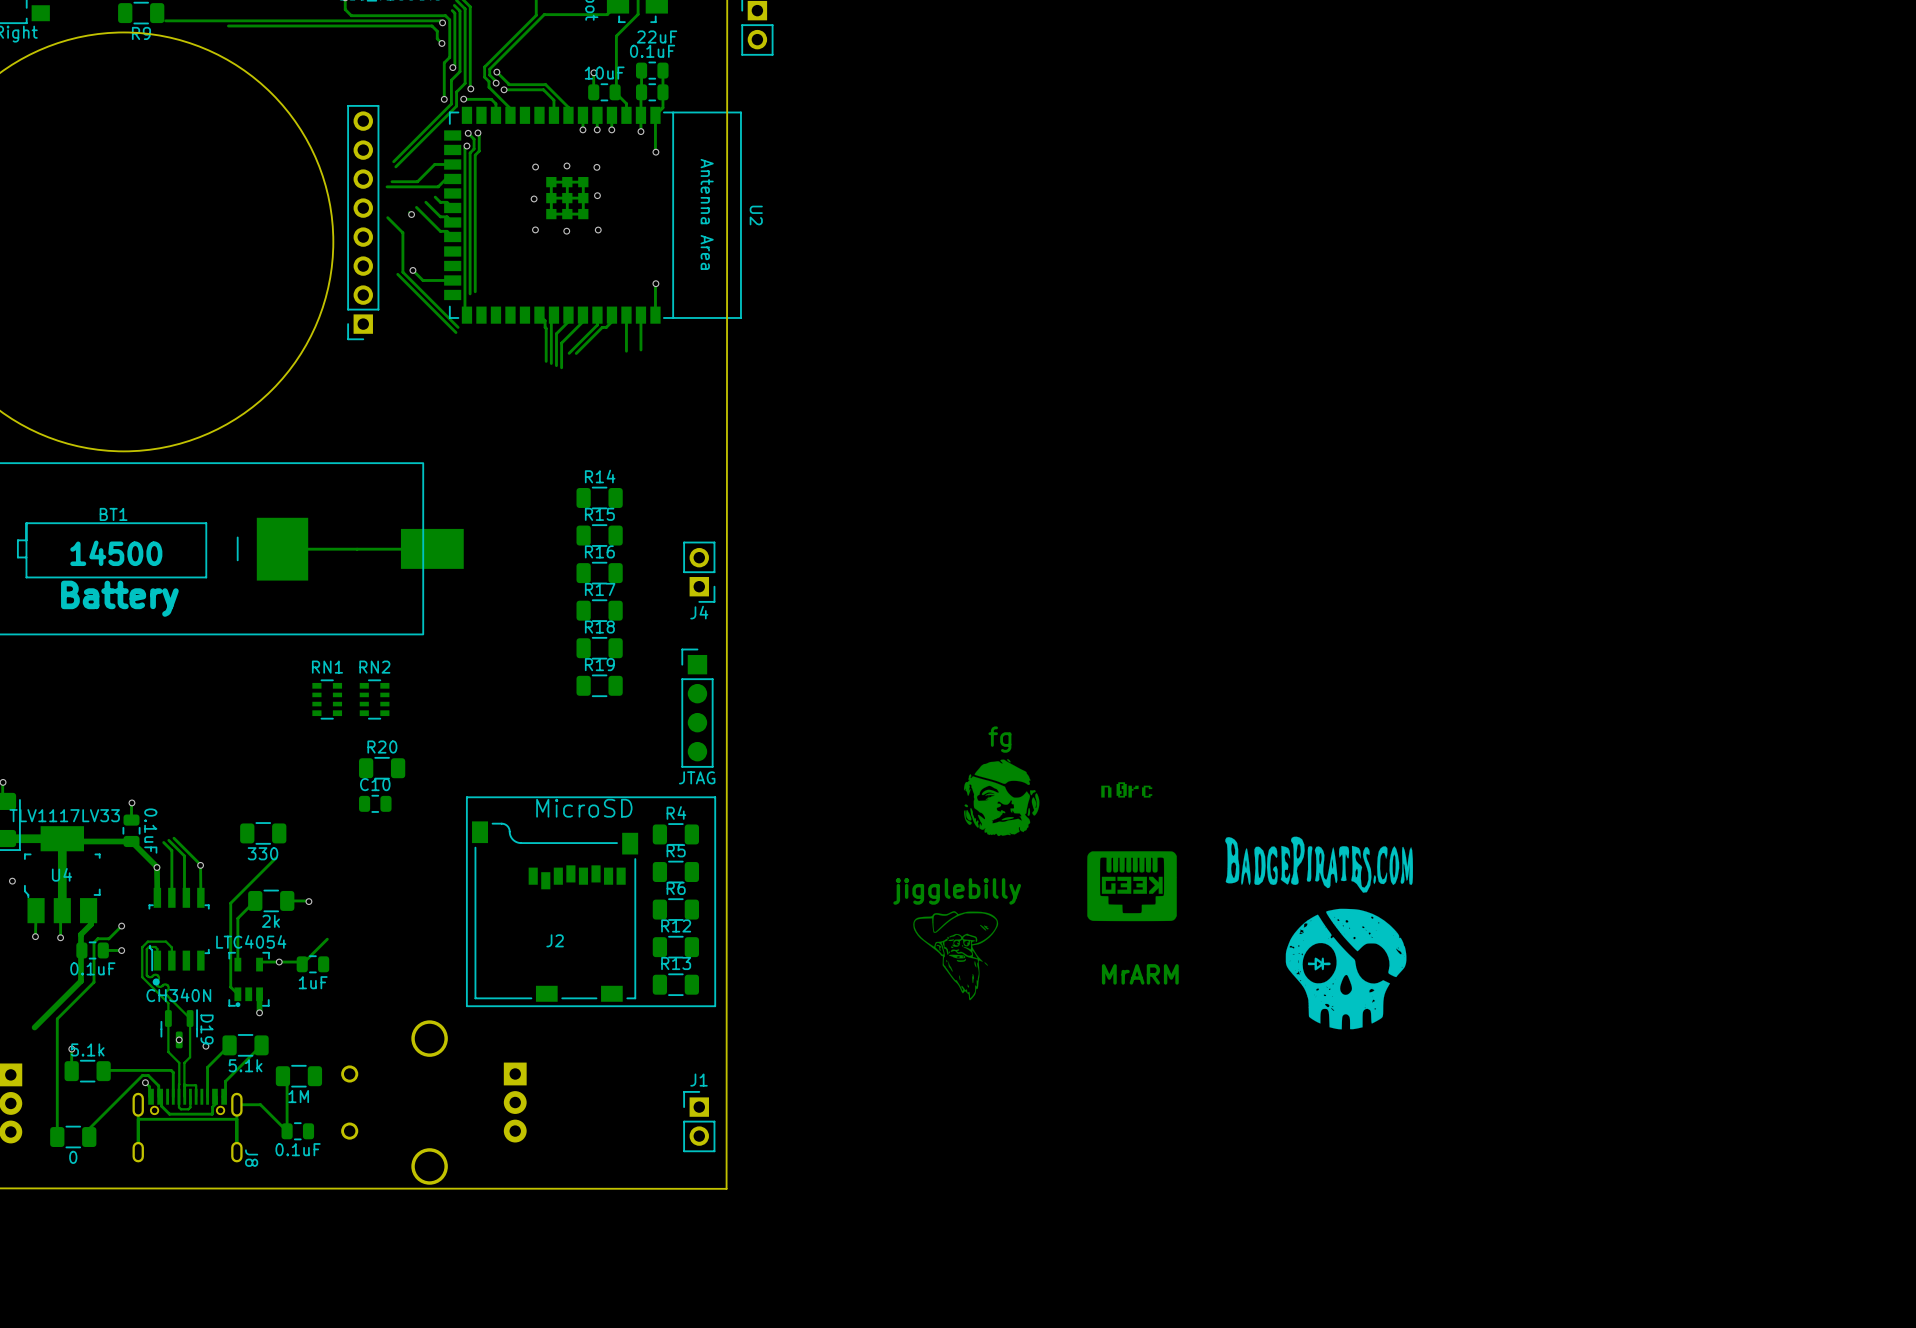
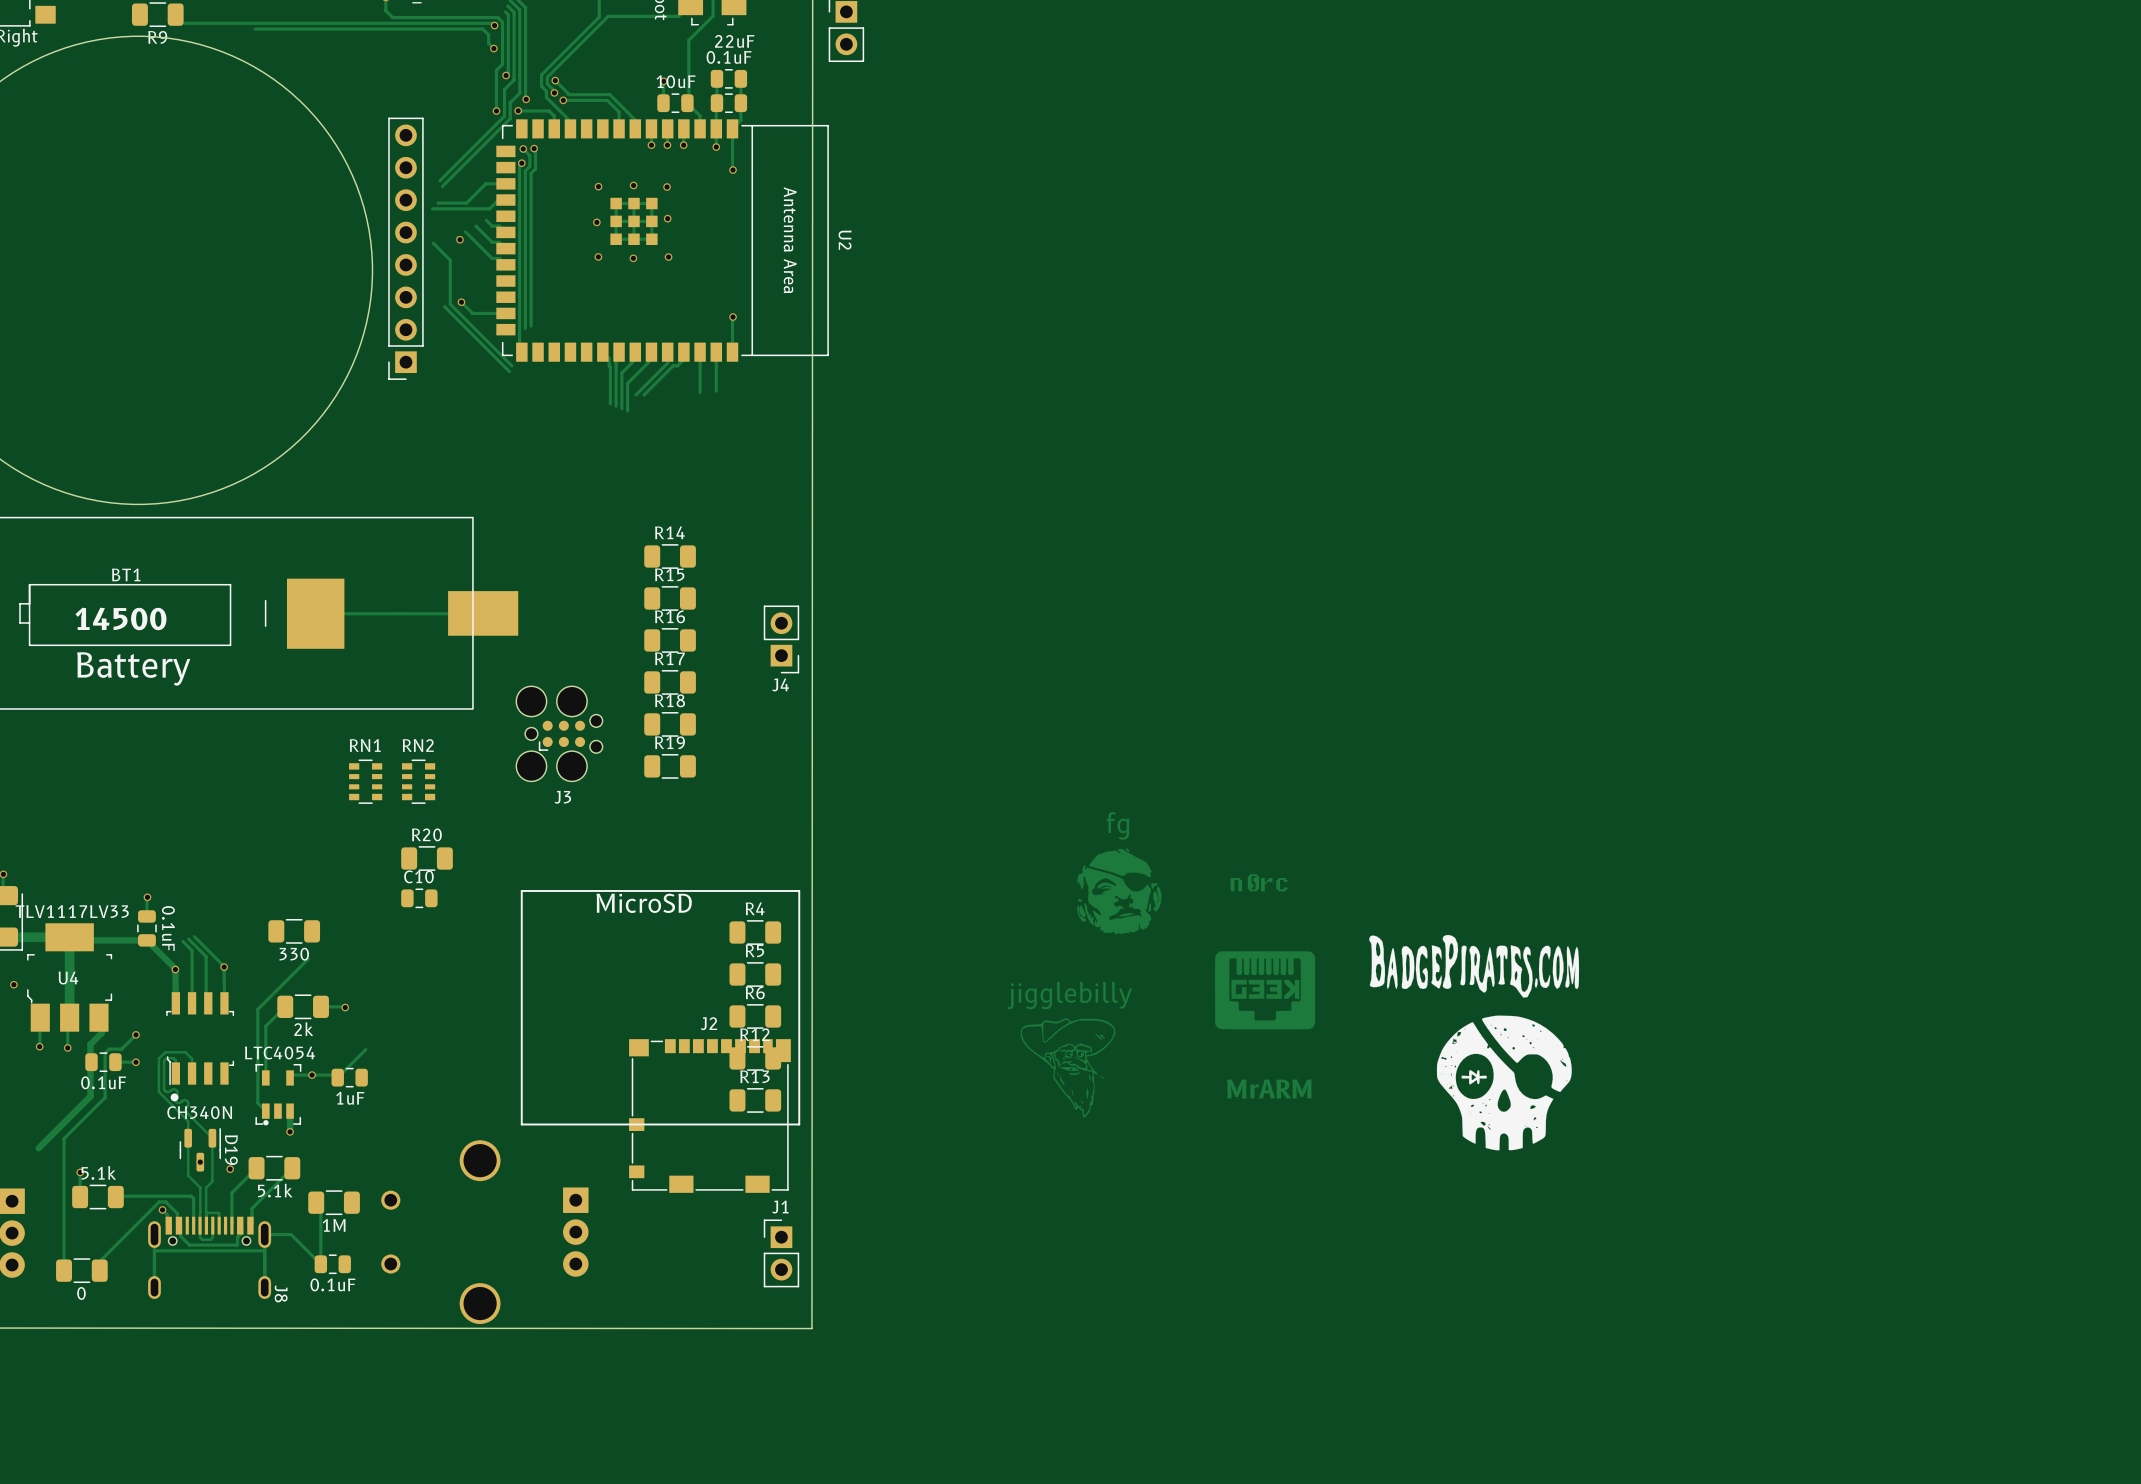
J3: none -> (559, 733)
part: JTAG (697, 708) -> none
J2 footprint: [472, 821, 639, 1002] -> [629, 1039, 791, 1193]
J2 name position: J2 (555, 940) -> J2 (708, 1023)

